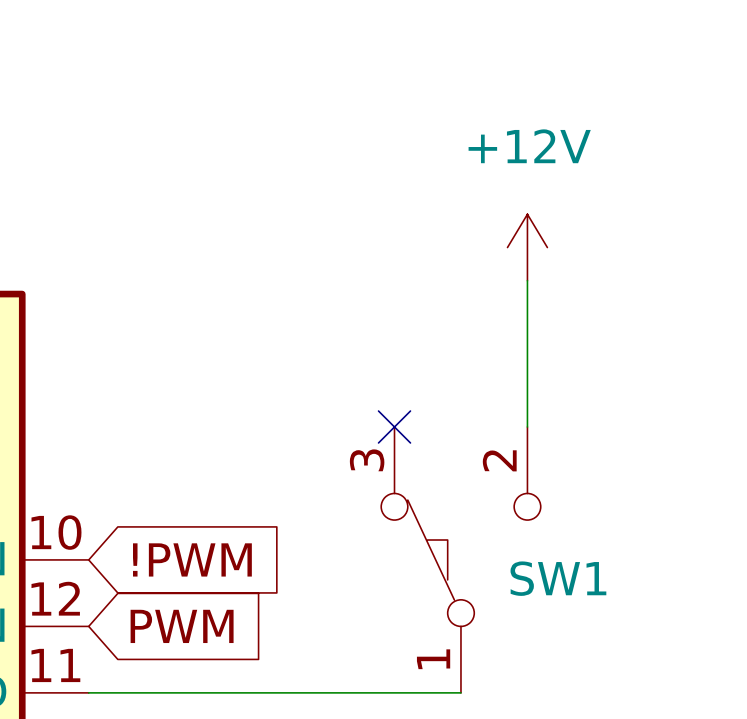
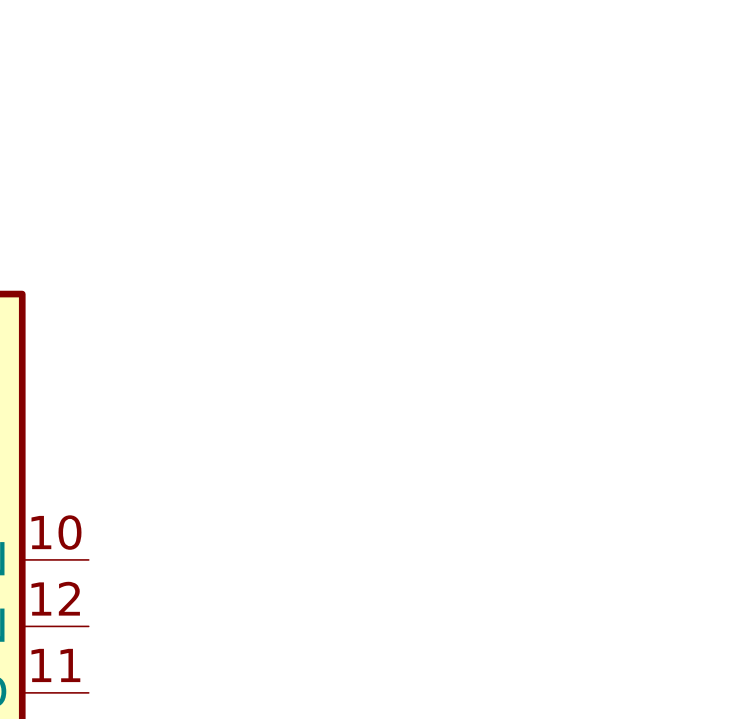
power symbol: +12V (527, 247) -> none
wire: (527, 280) (527, 427) -> none
no-connect mark: (394, 427) -> none
global label: !PWM (192, 559) -> none
SW1: (460, 559) -> none
global label: PWM (182, 626) -> none
wire: (88, 692) (460, 692) -> none

